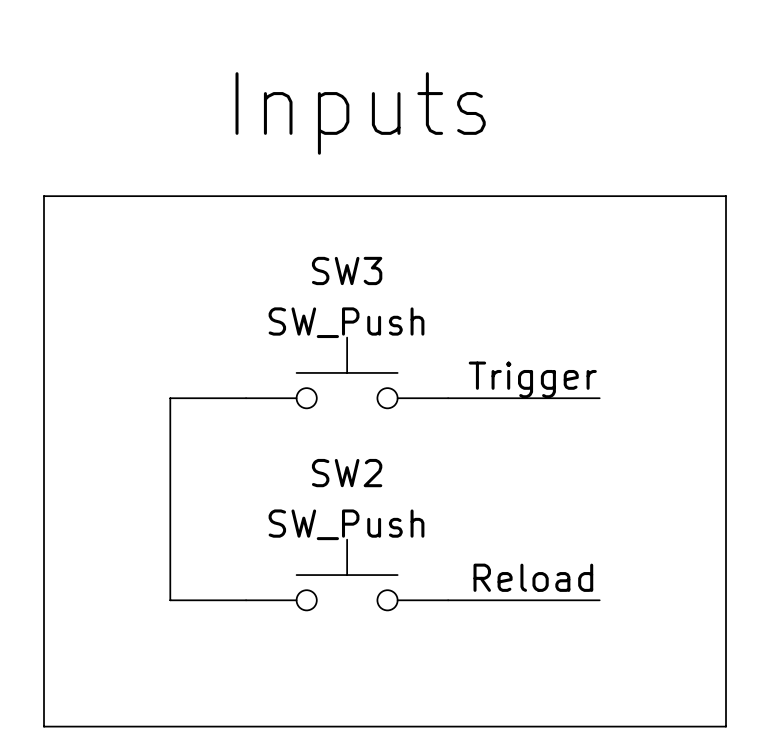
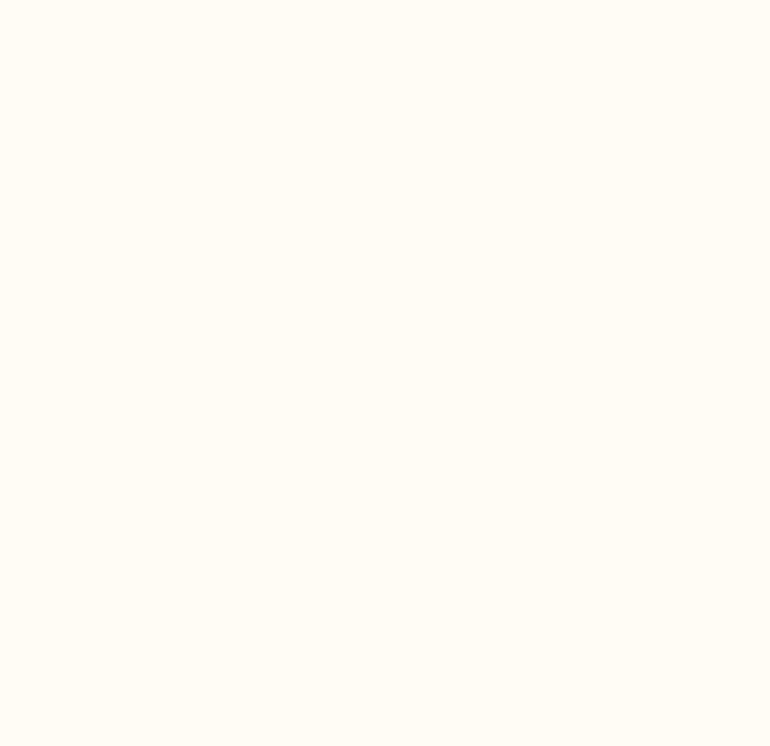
text: Inputs (360, 113) -> none
line: (44, 196) (726, 196) (726, 726) (44, 726) (44, 196) -> none
SW3: SW_Push (347, 372) -> none
label: Trigger (532, 379) -> none
wire: (246, 398) (170, 398) (170, 600) (246, 600) -> none
wire: (448, 398) (599, 398) -> none
SW2: SW_Push (347, 575) -> none
label: Reload (533, 577) -> none
wire: (448, 600) (599, 600) -> none

